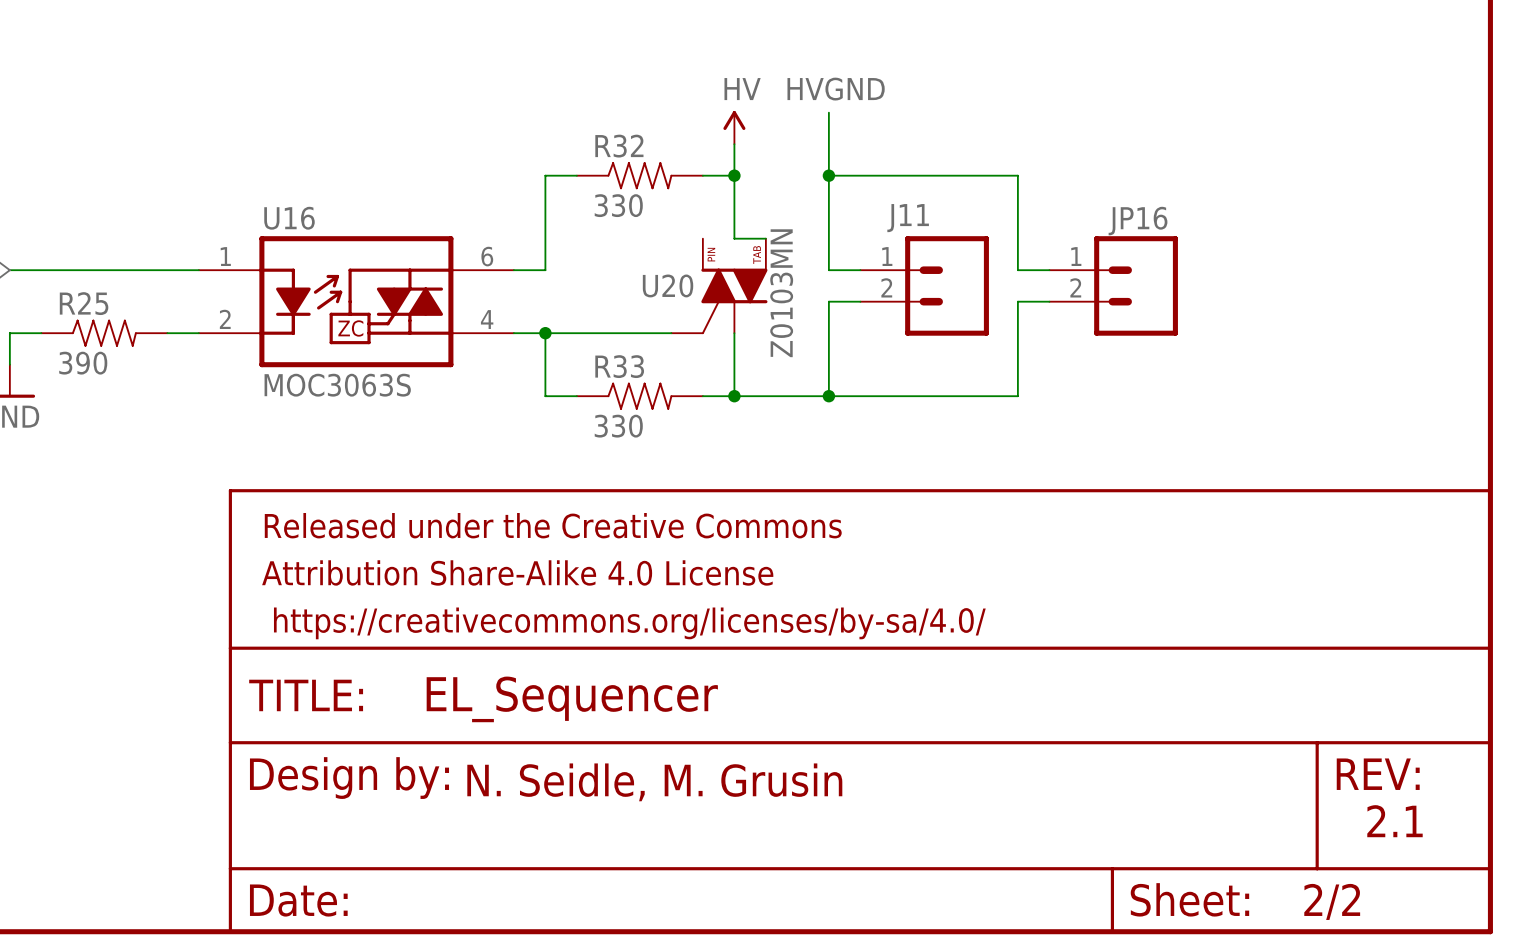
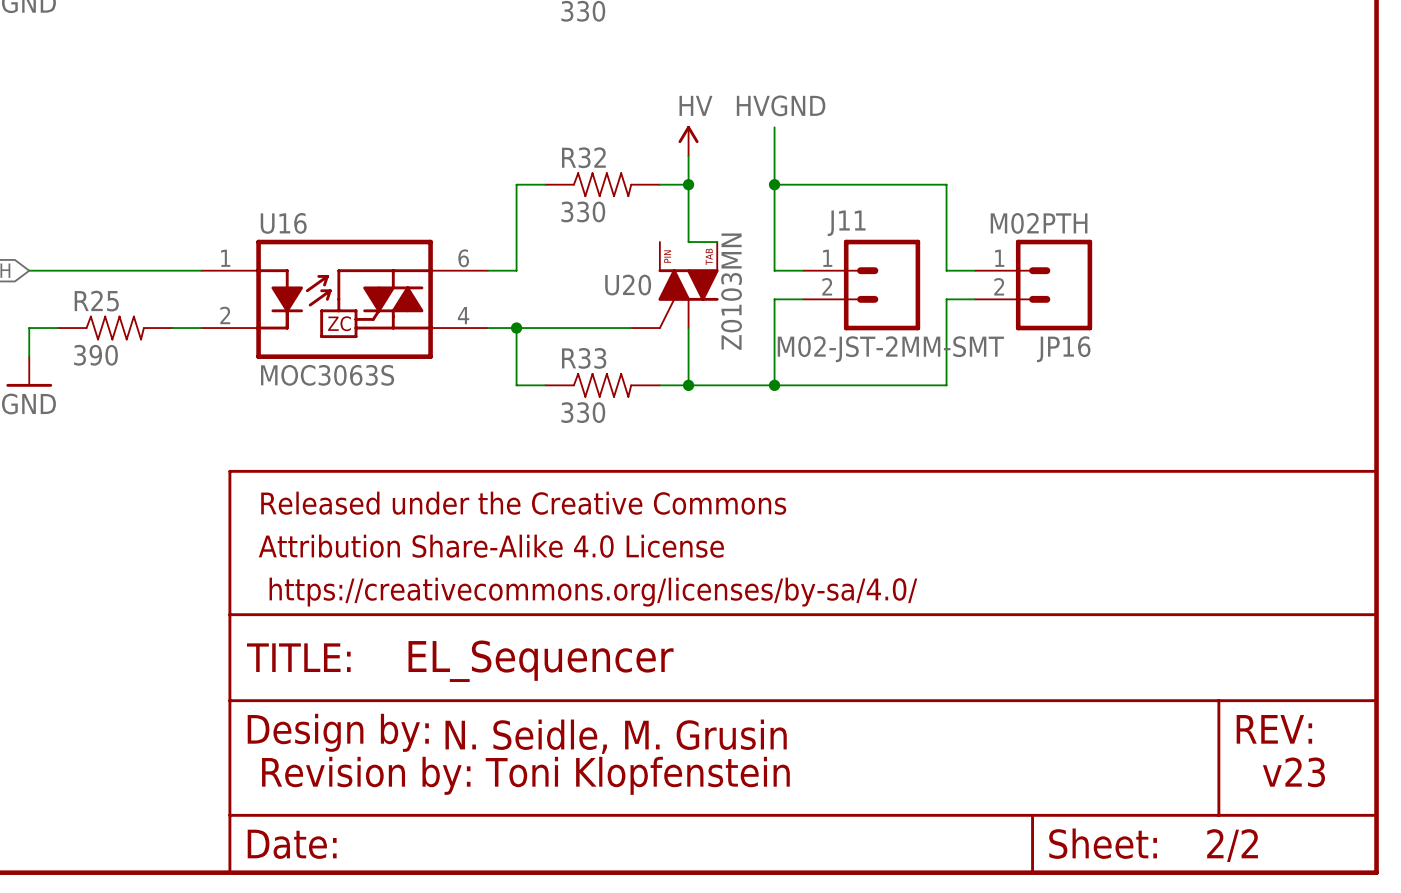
JP16 value: none -> M02PTH (1039, 223)
JP16 name position: JP16 (1138, 221) -> JP16 (1063, 349)
J11 value: none -> M02-JST-2MM-SMT (890, 349)
text: 2.1 (1394, 821) -> v23 (1293, 772)
text: none -> Revision by: Toni Klopfenstein (525, 775)

